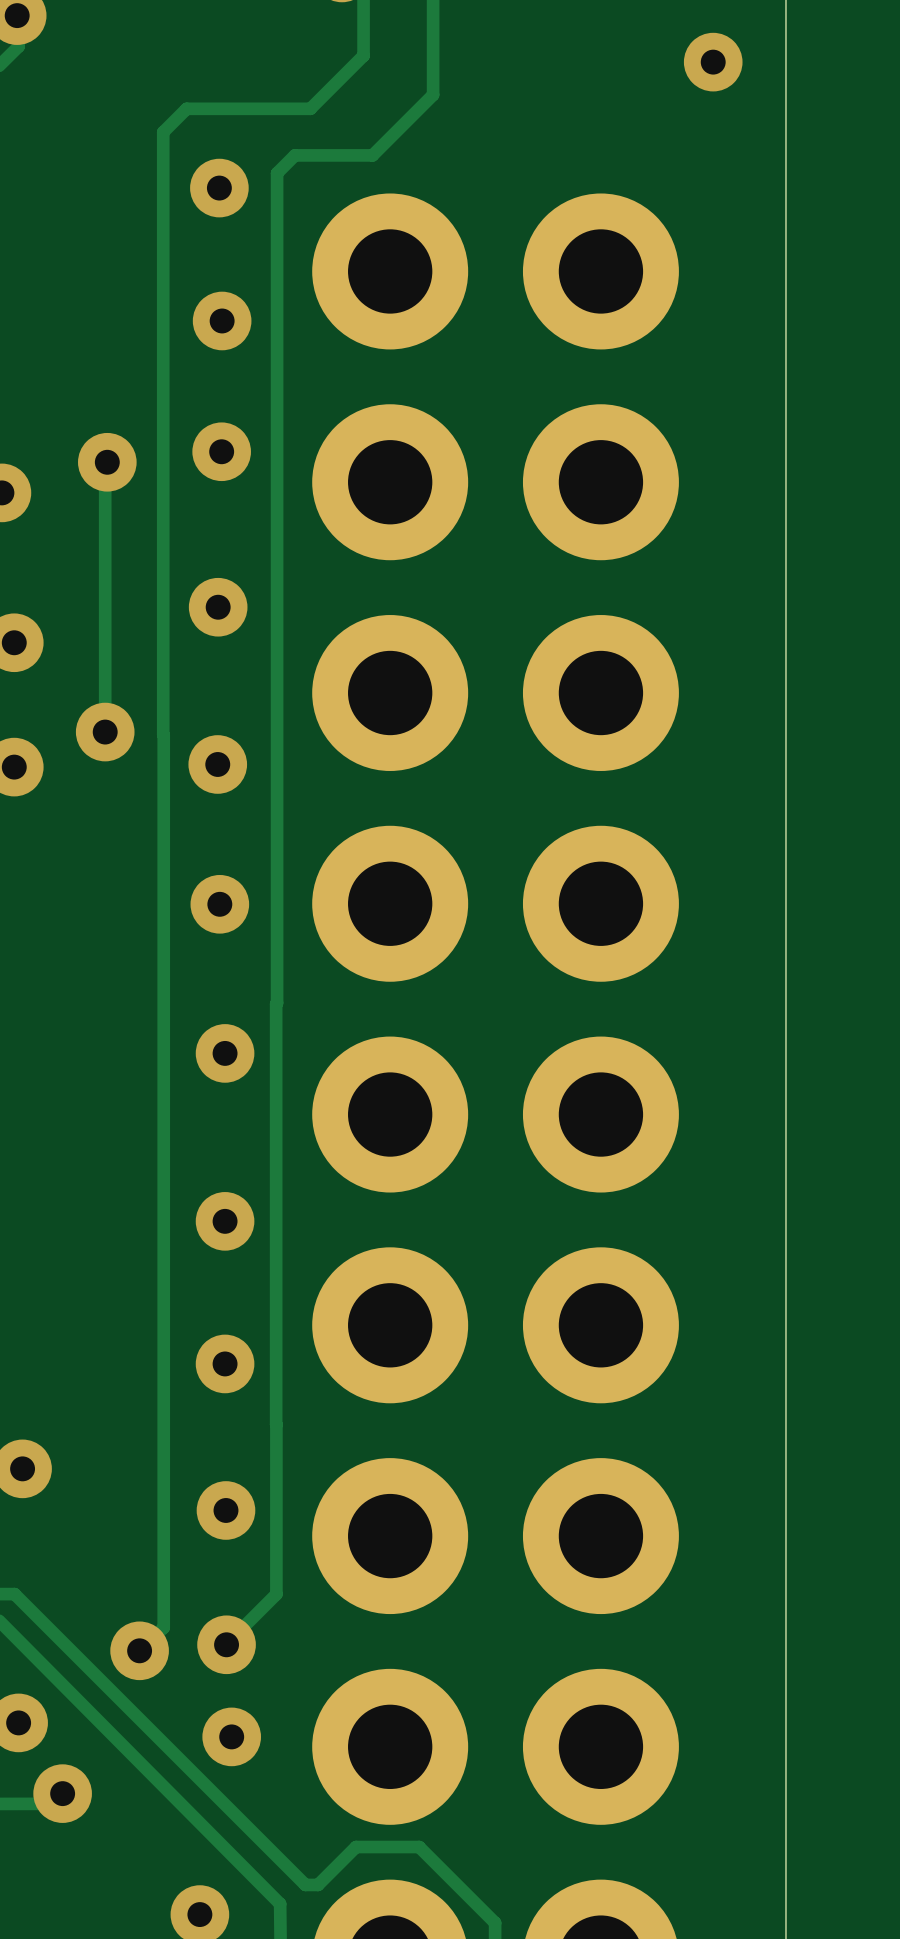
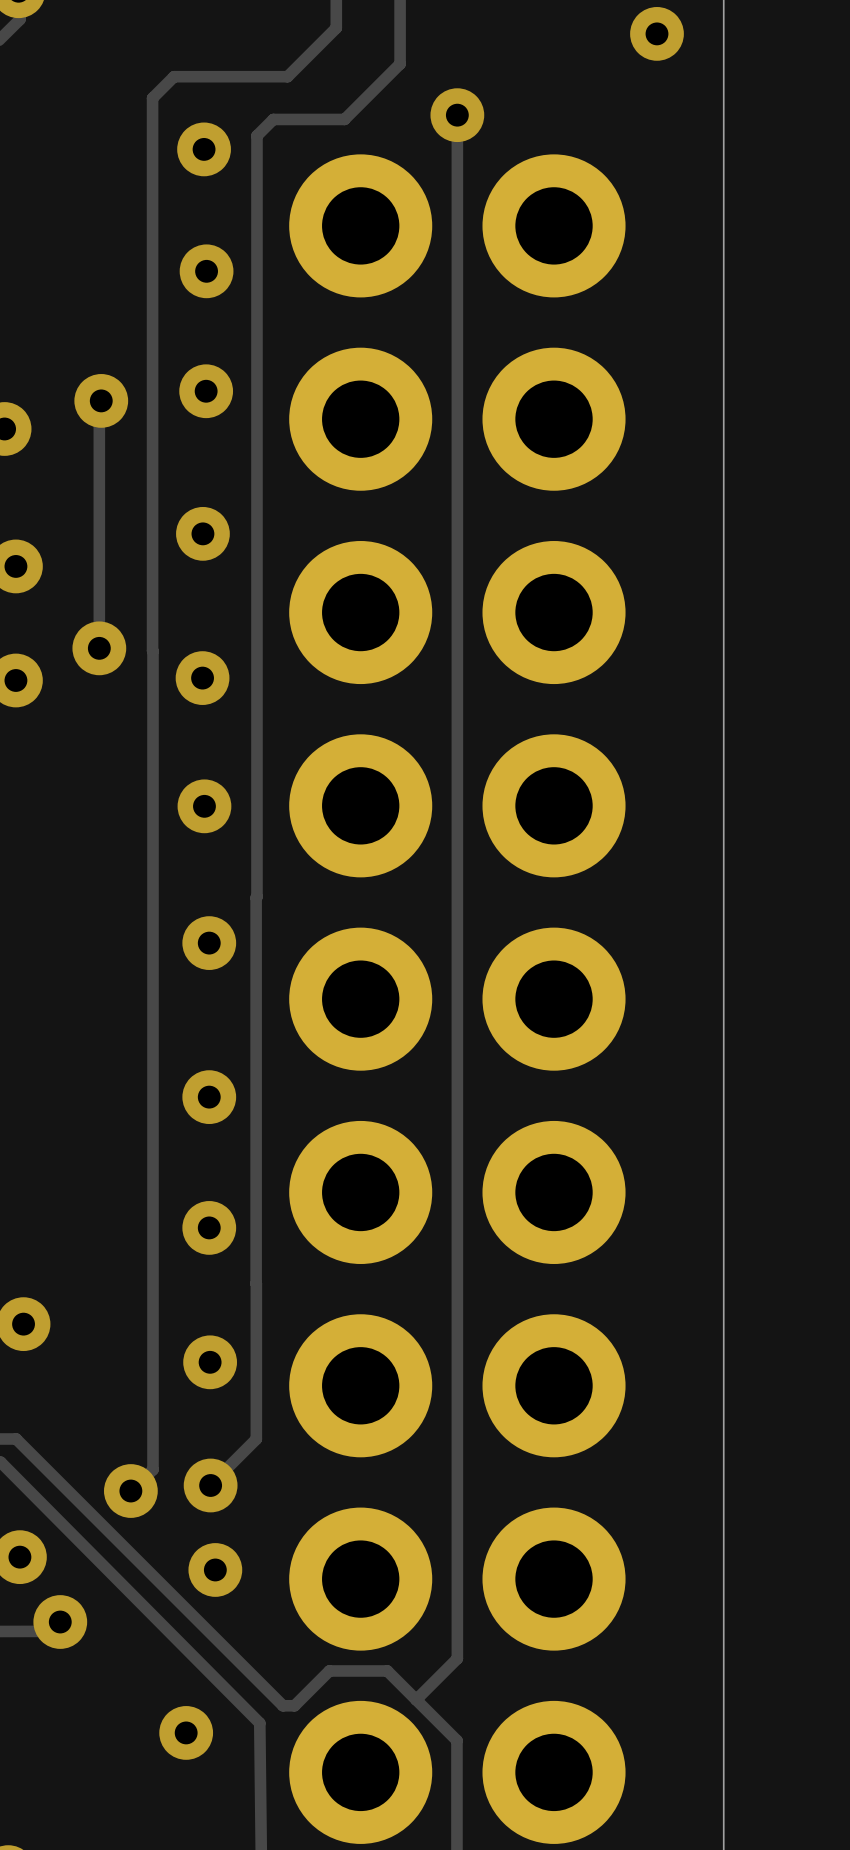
track: none -> (457, 115) (457, 1658) (416, 1699)
via: none -> (457, 115)

